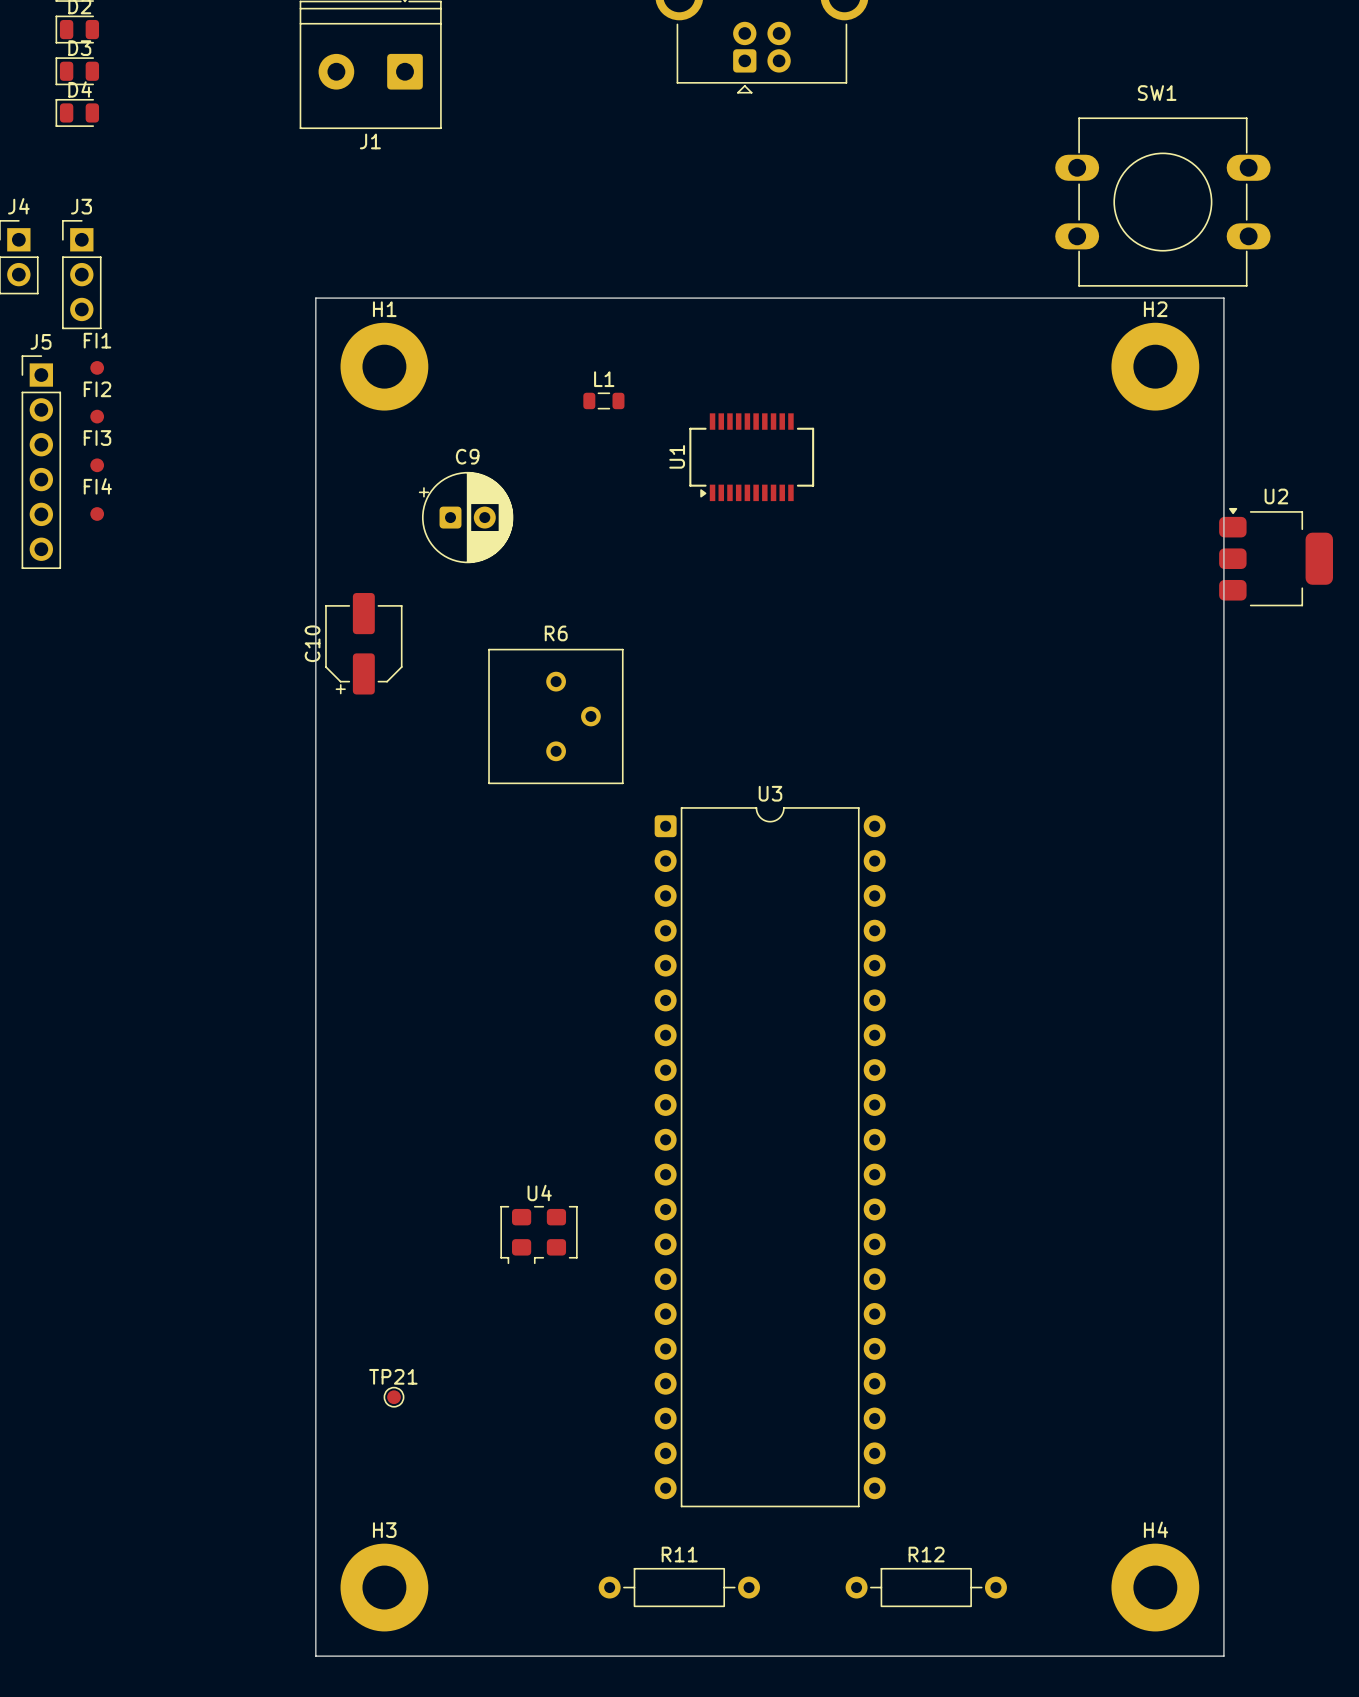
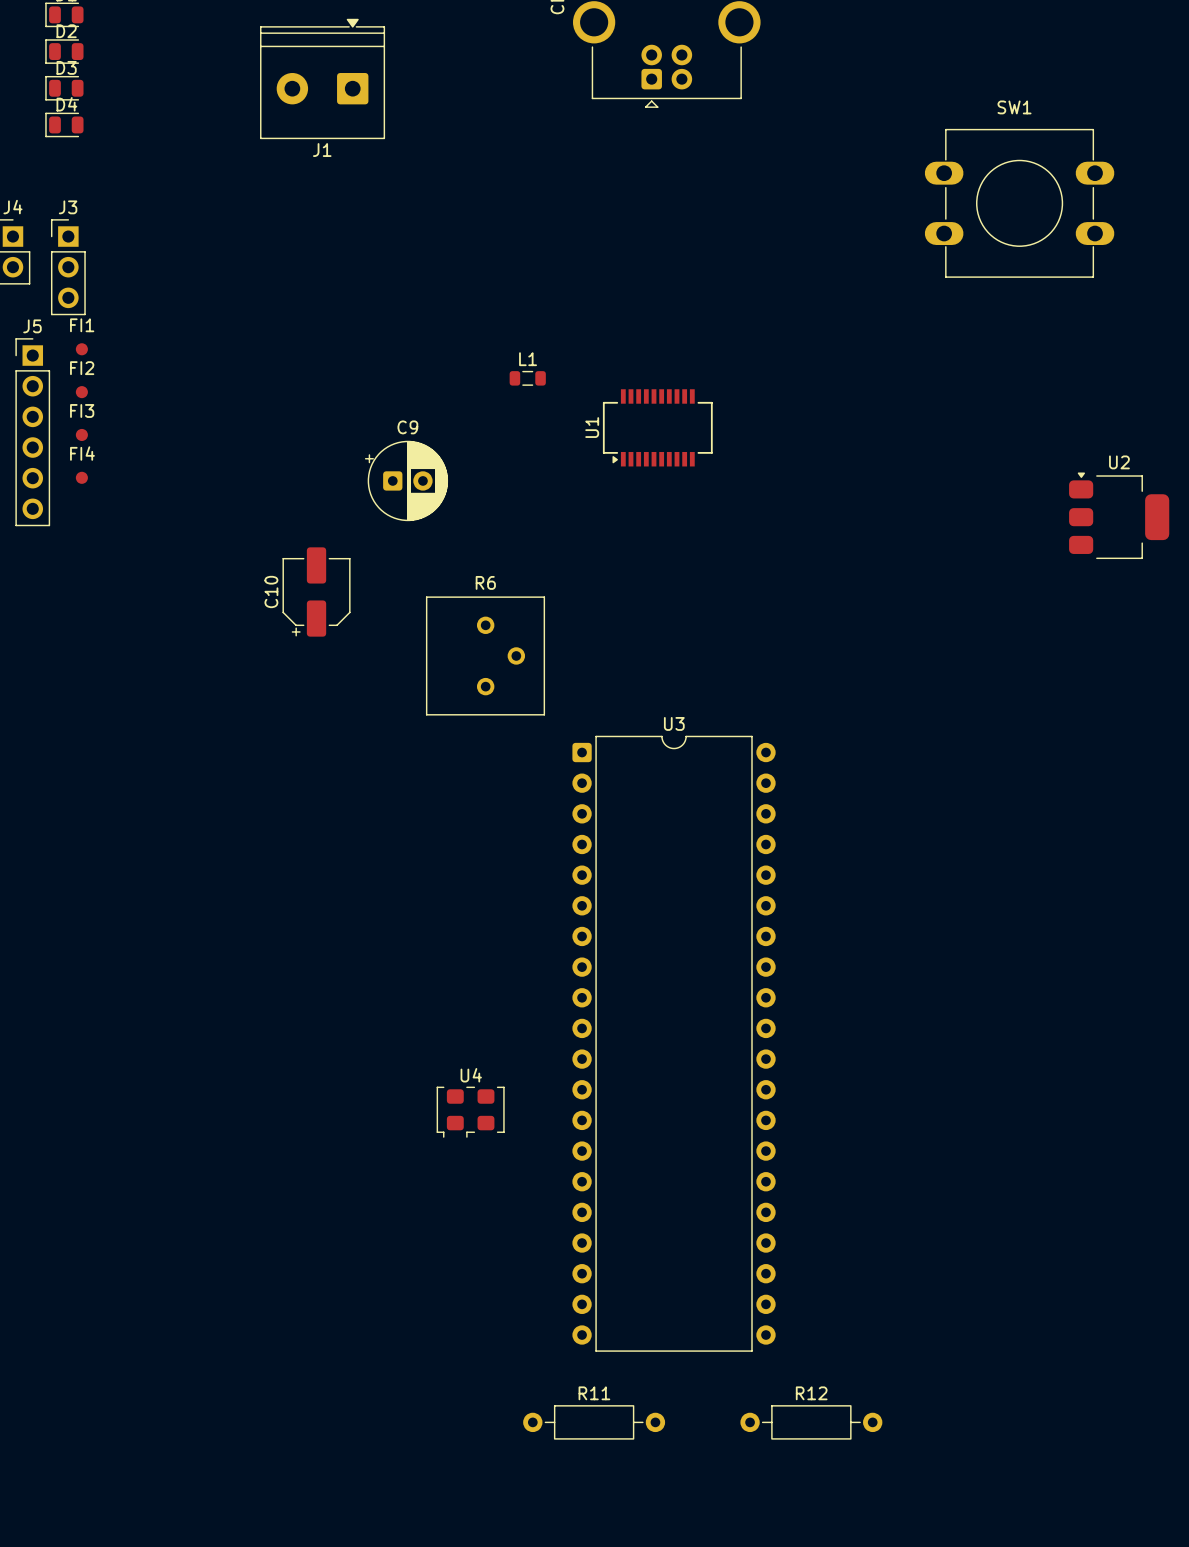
board edge: (315, 298) (1223, 298) (1223, 1656) (315, 1656) (315, 298) -> none
H1: (384, 366) -> none
H2: (1155, 366) -> none
TP21: (394, 1397) -> none
H3: (384, 1587) -> none
H4: (1155, 1587) -> none

